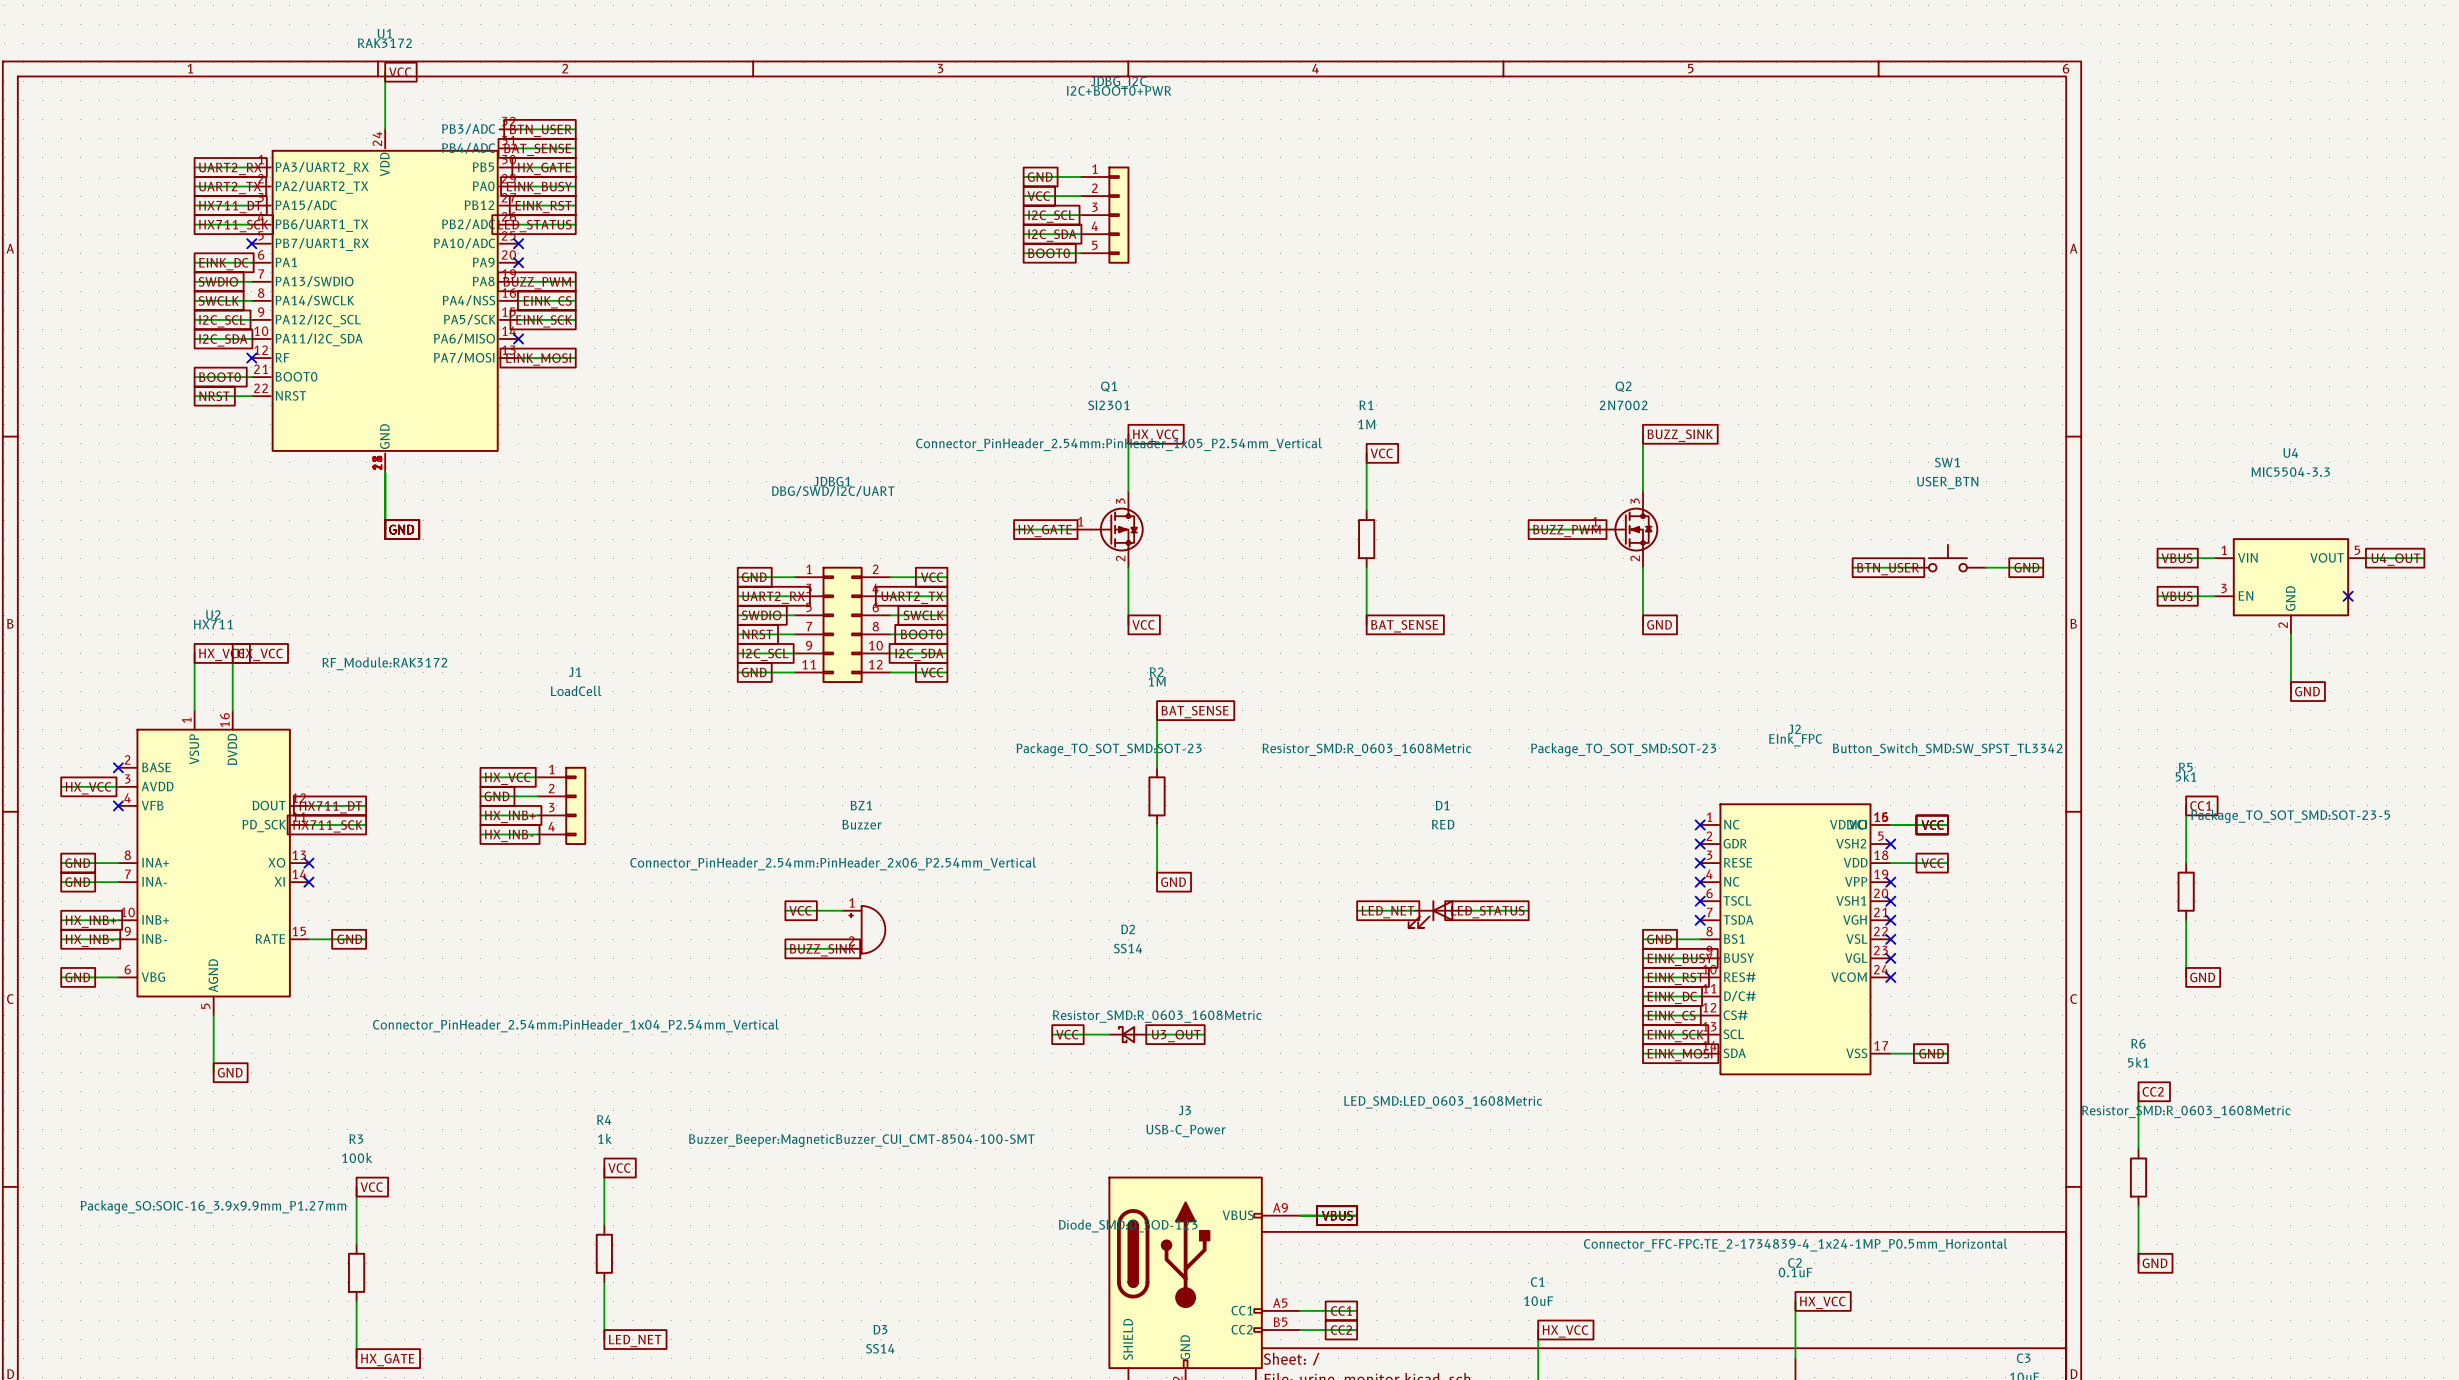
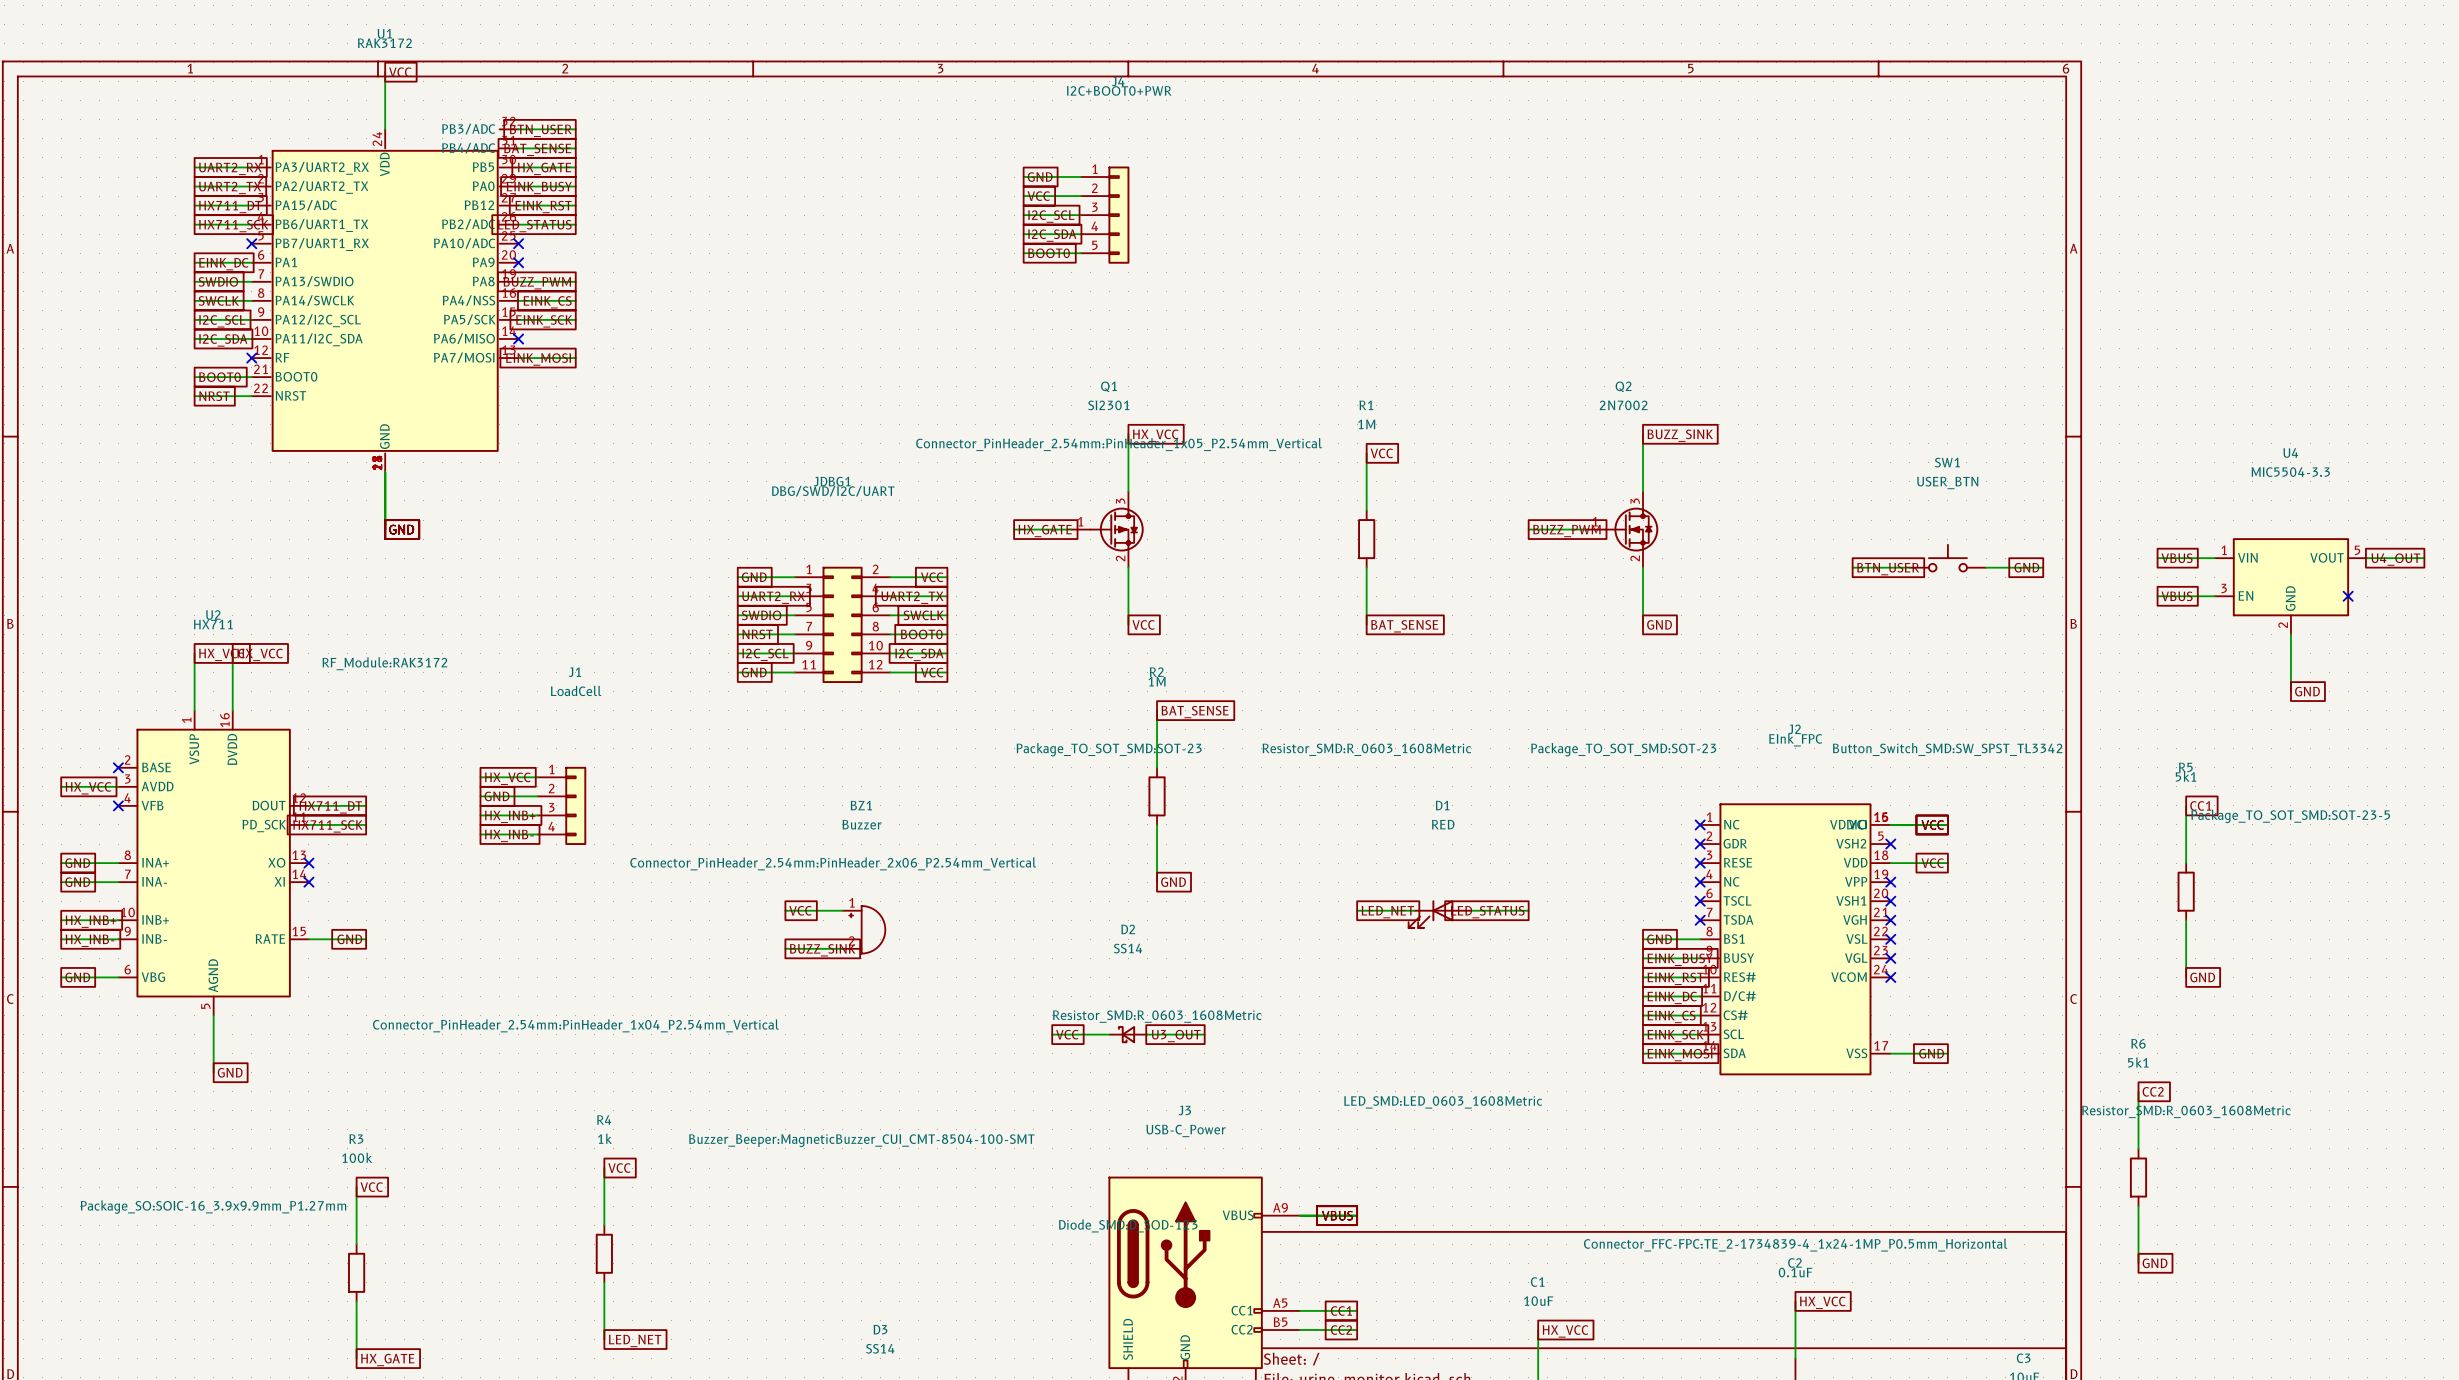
JDBG_I2C name: JDBG_I2C (1118, 82) -> J4 (1118, 81)

